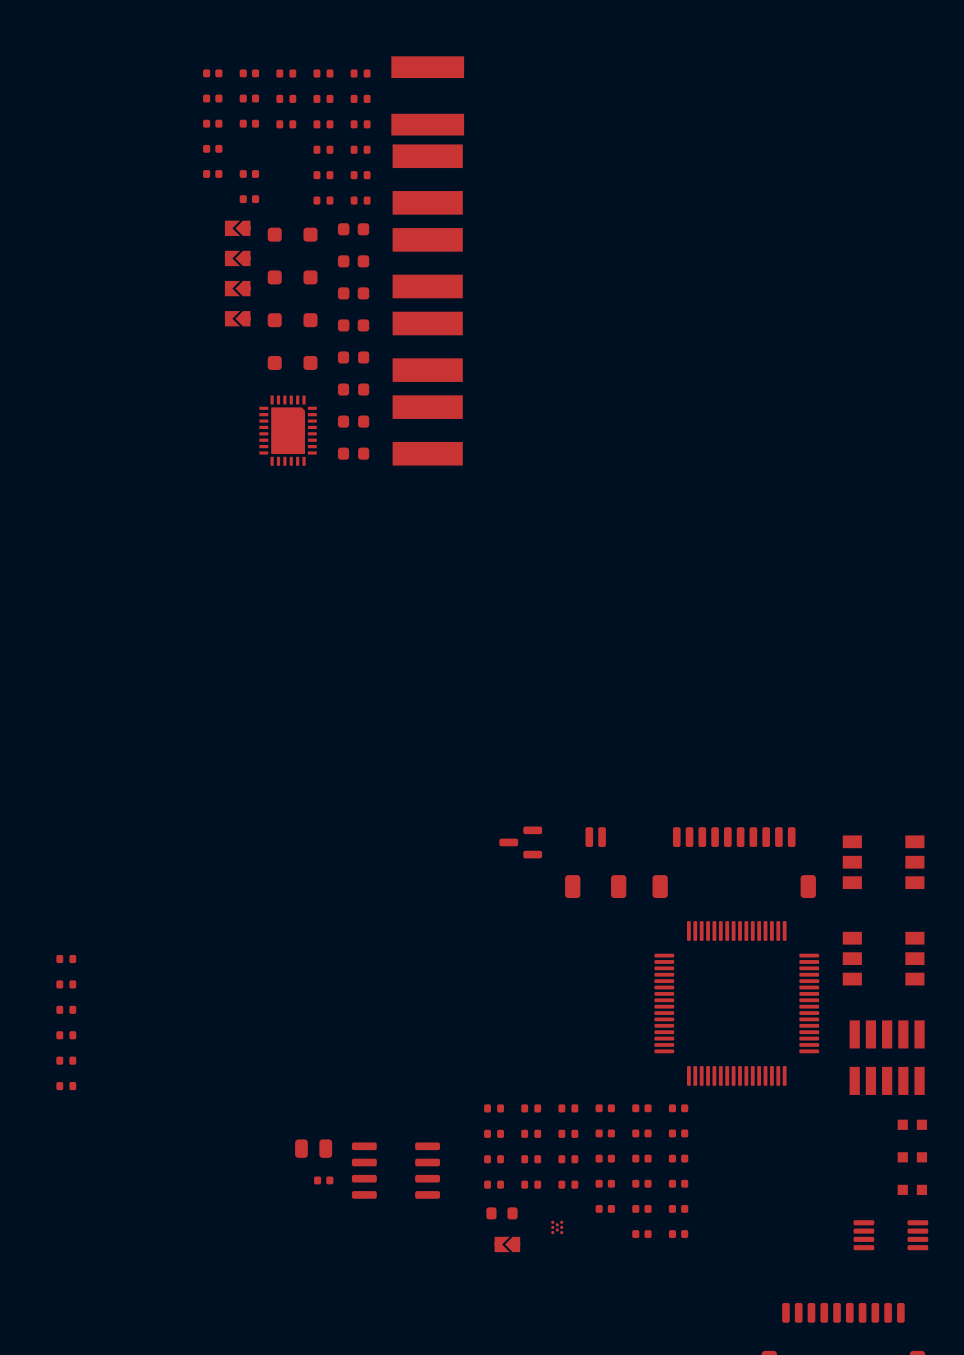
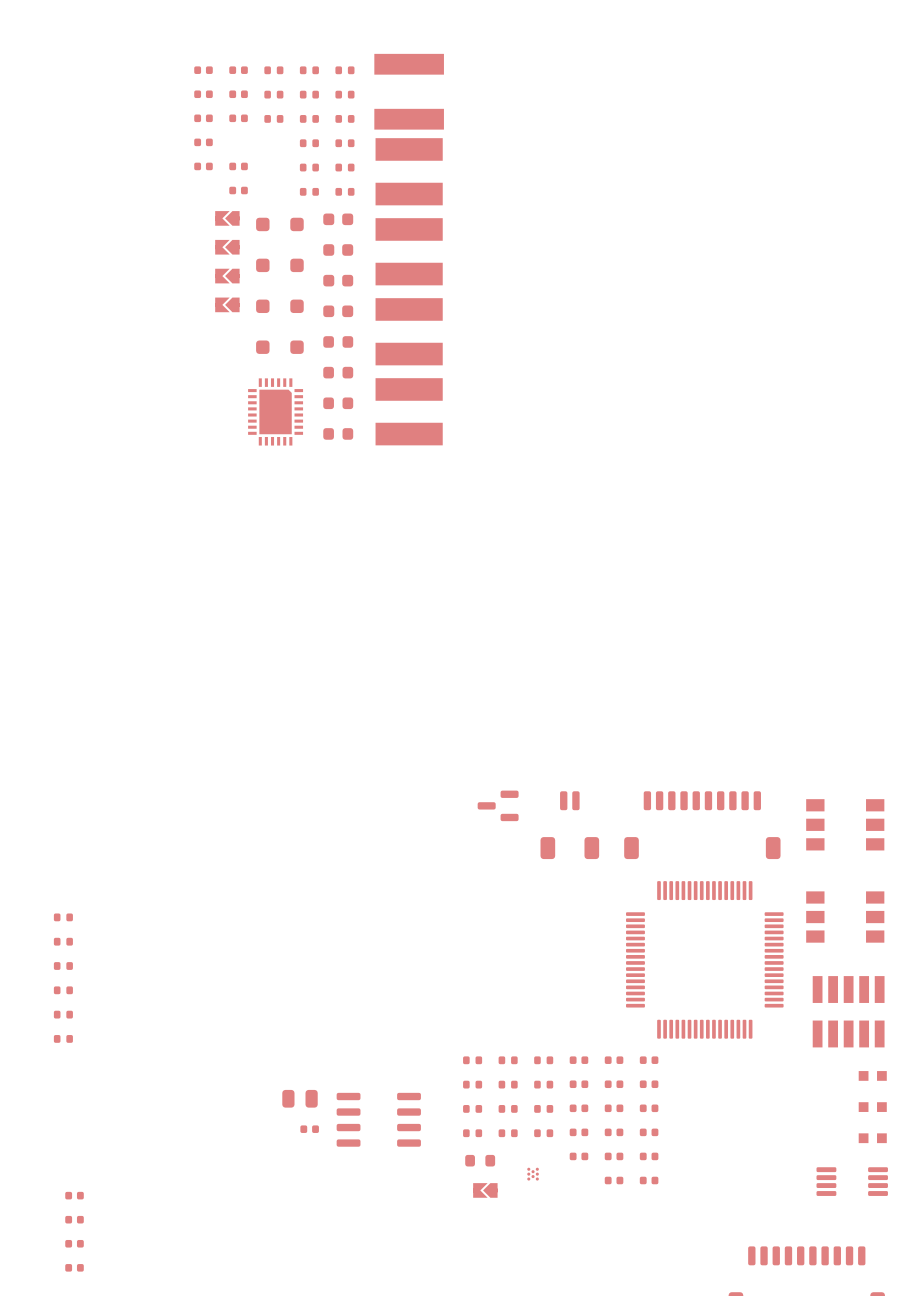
part: none -> (74, 1195)
part: none -> (74, 1219)
part: none -> (74, 1243)
part: none -> (74, 1267)

